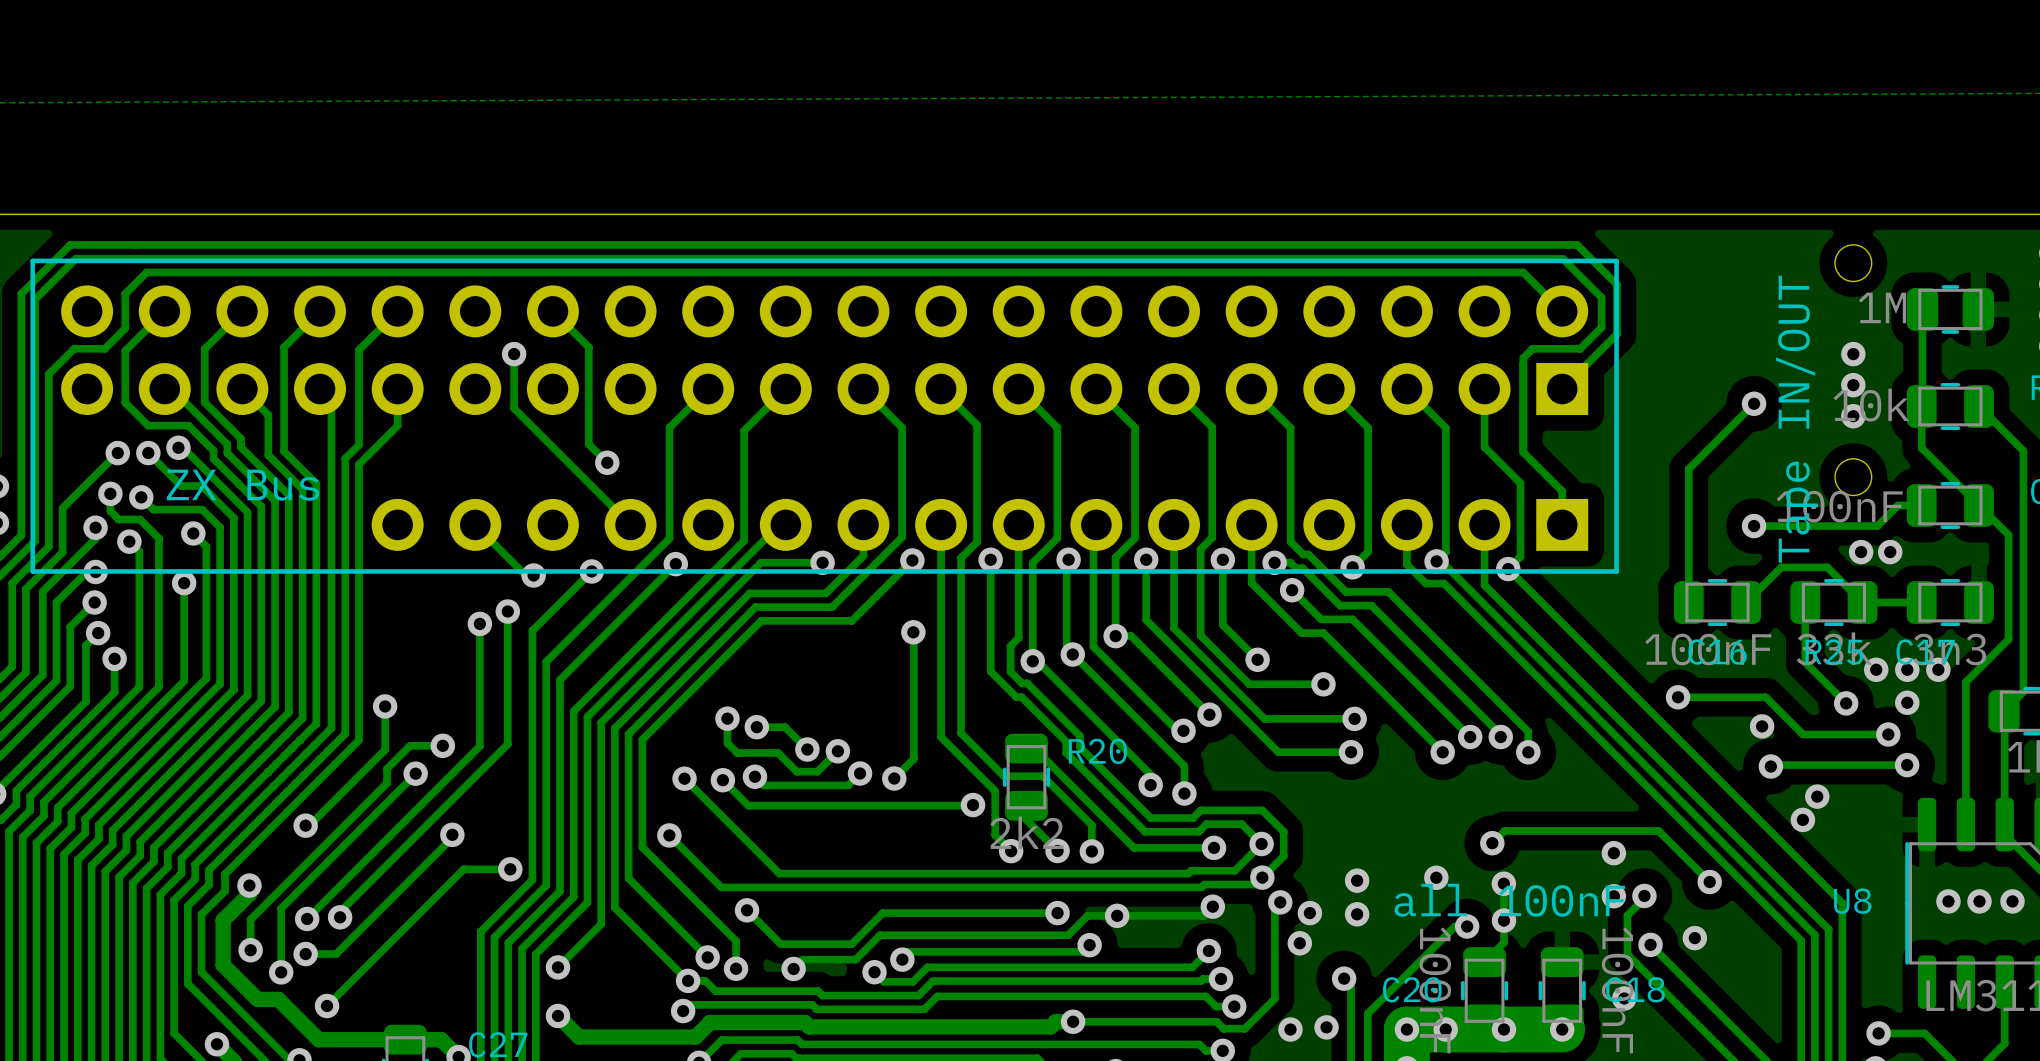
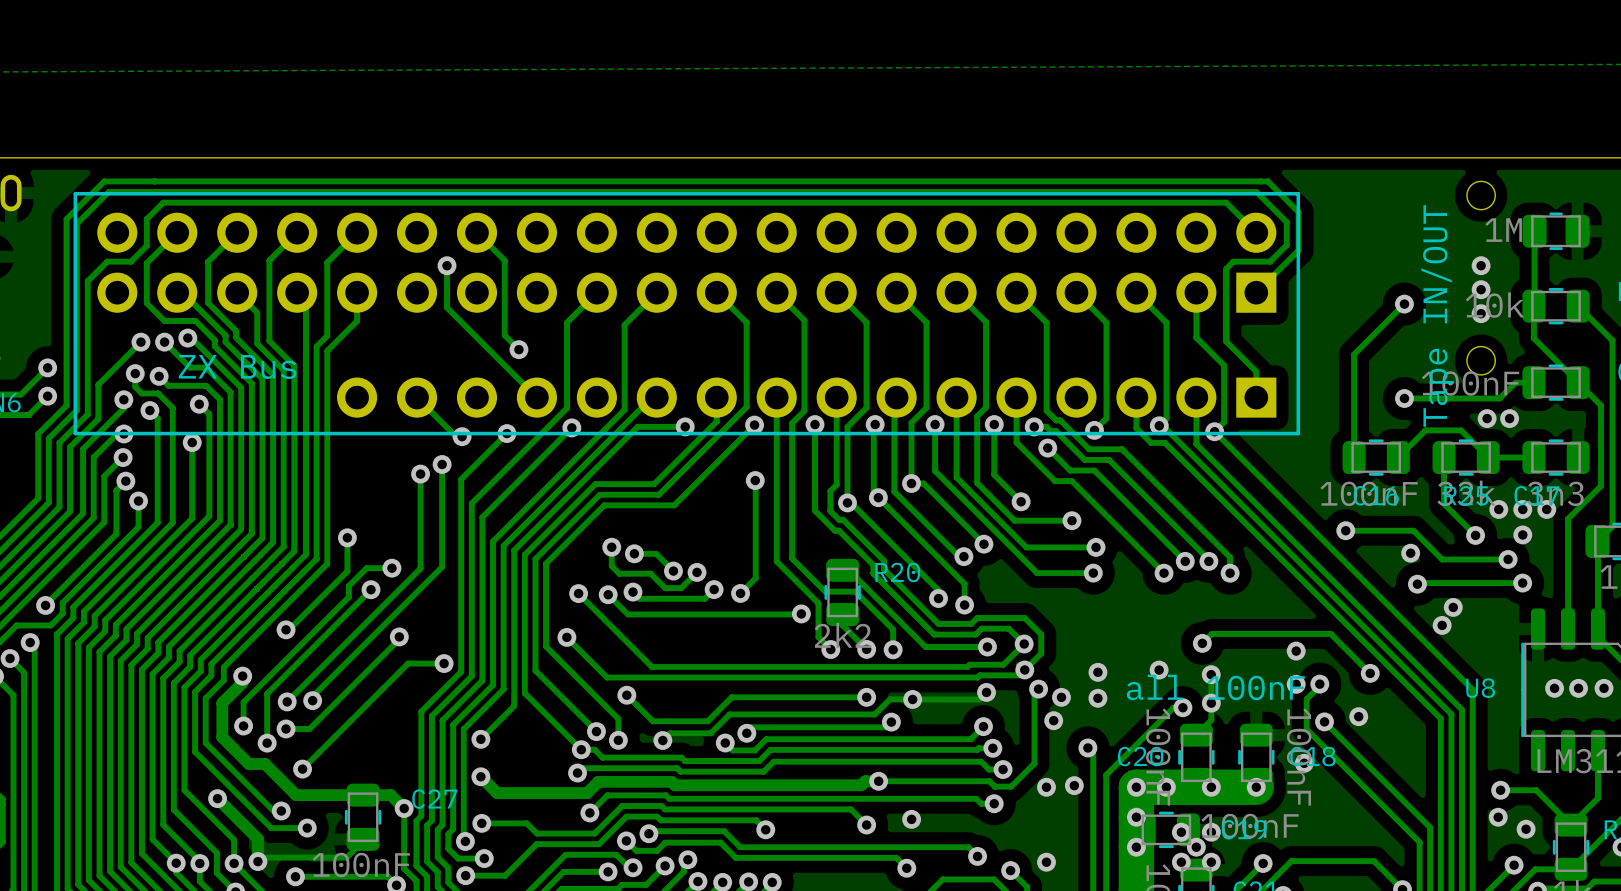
track: (825, 593) (749, 593) (706, 636) -> (687, 450) (654, 484) (595, 484)
track: (832, 607) (755, 607) (712, 650) -> (692, 461) (658, 494) (599, 494)
track: (851, 620) (761, 620) (717, 664) -> (707, 471) (674, 505) (604, 505)

